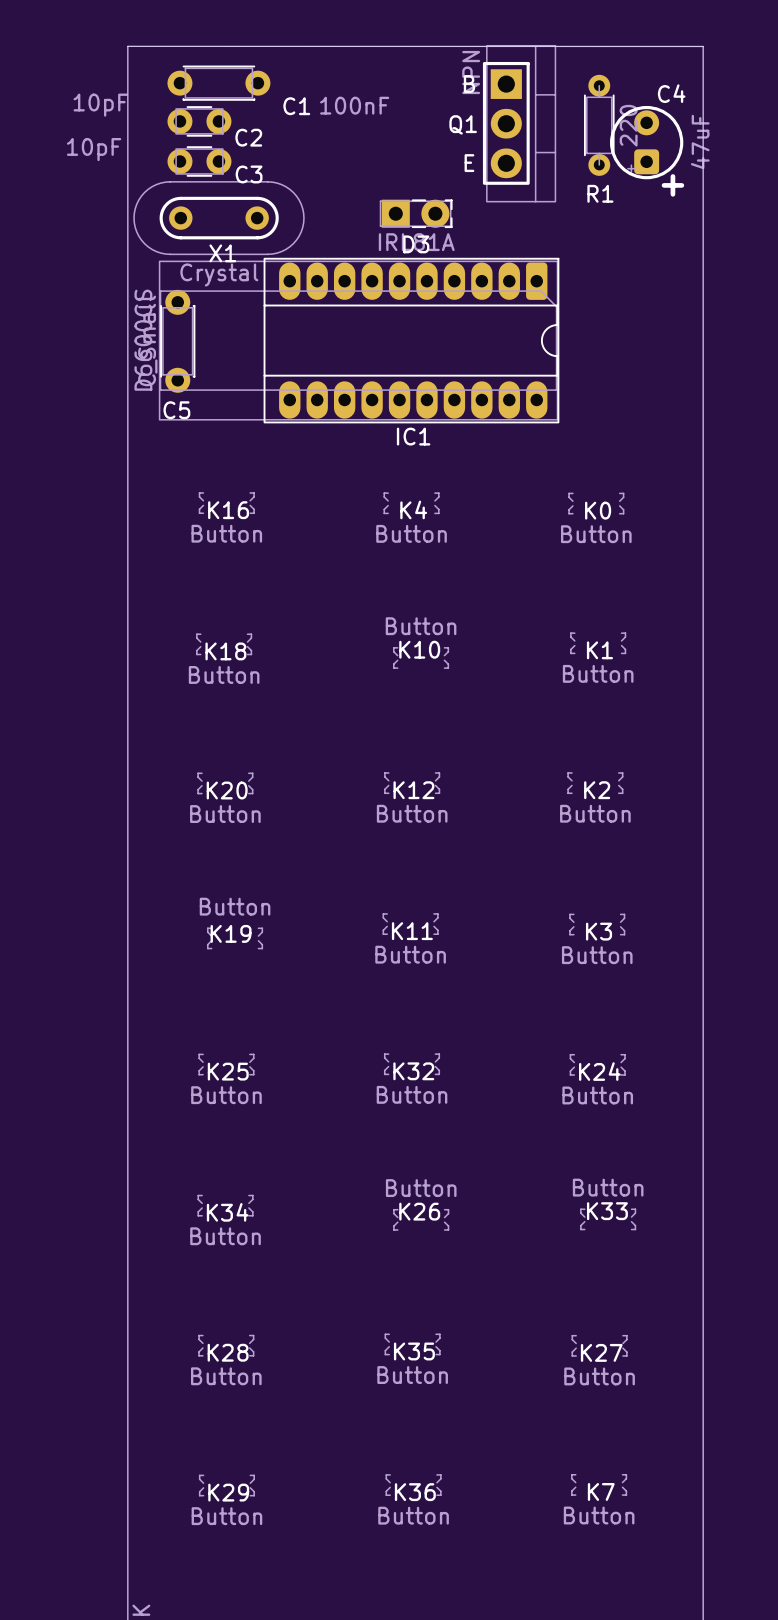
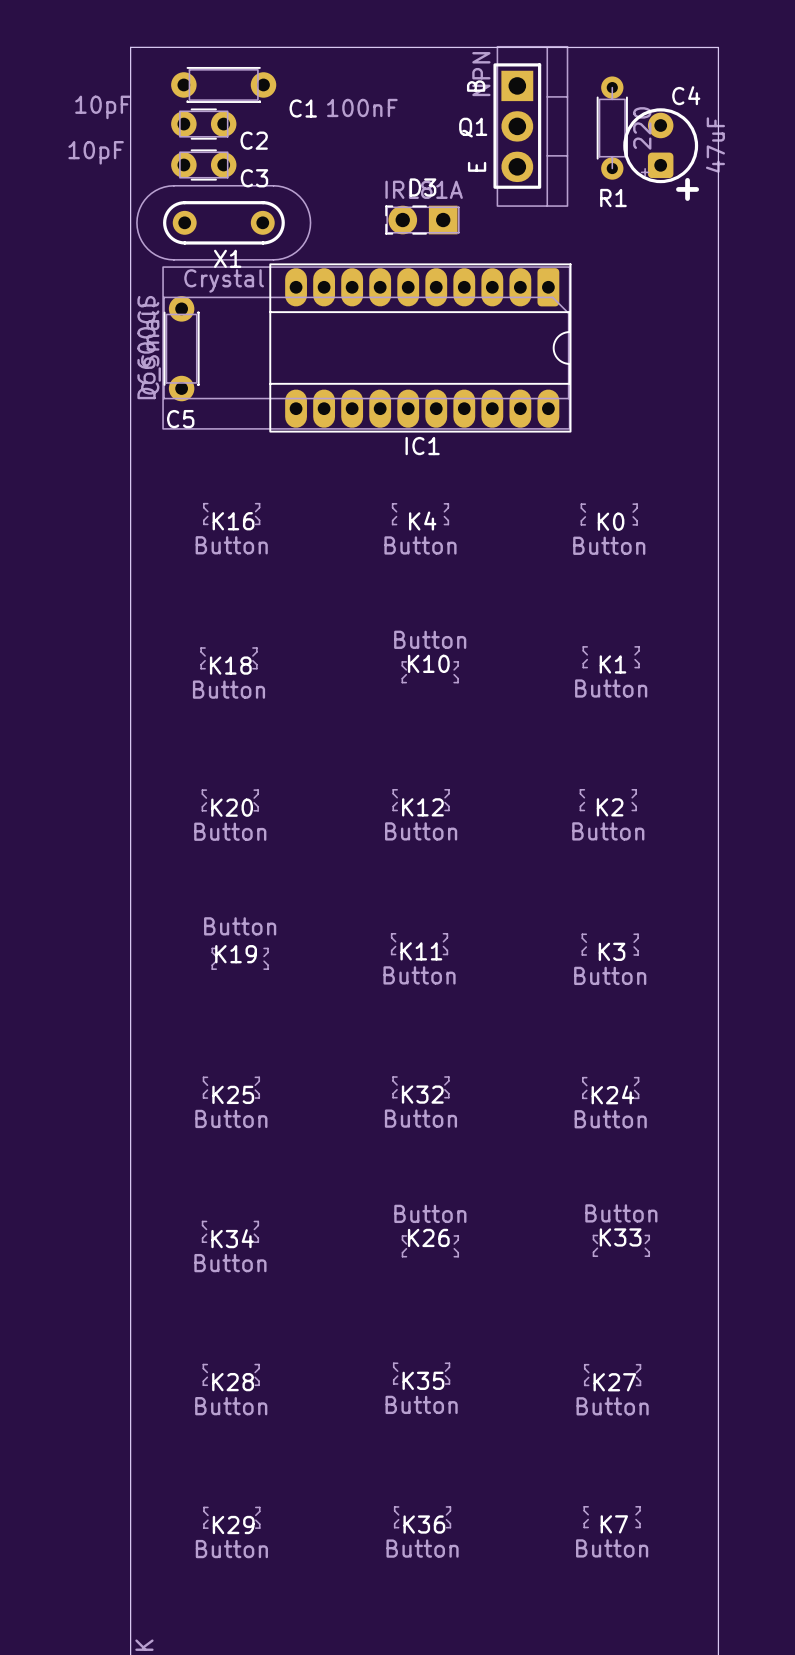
text rotation: 0° (469, 84) -> 90° counterclockwise (476, 86)
text rotation: 0° (469, 163) -> 90° counterclockwise (477, 166)
D3 rotation: 0° (416, 213) -> 180° (422, 220)

